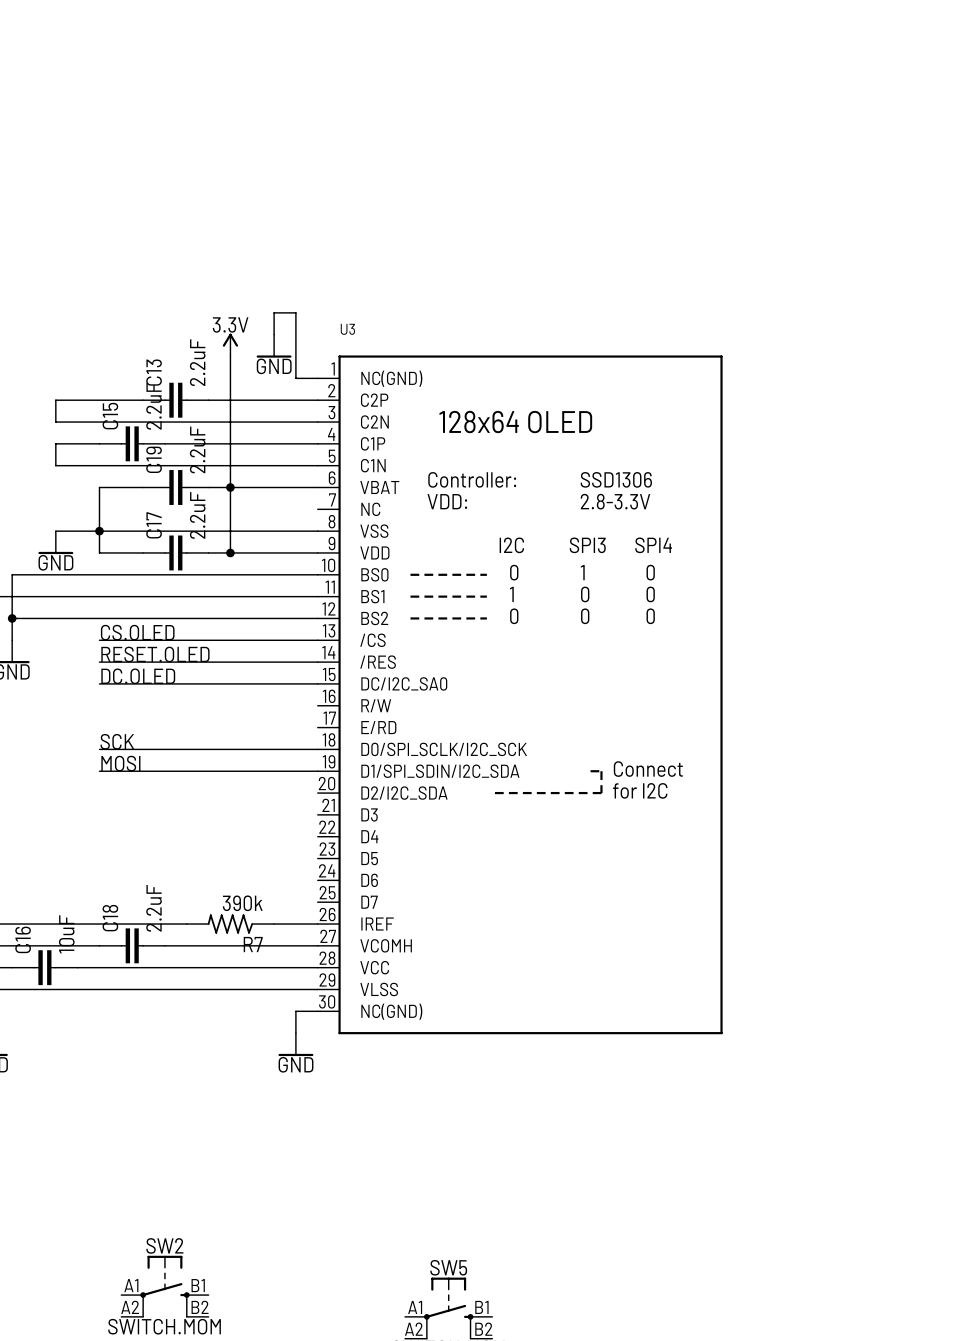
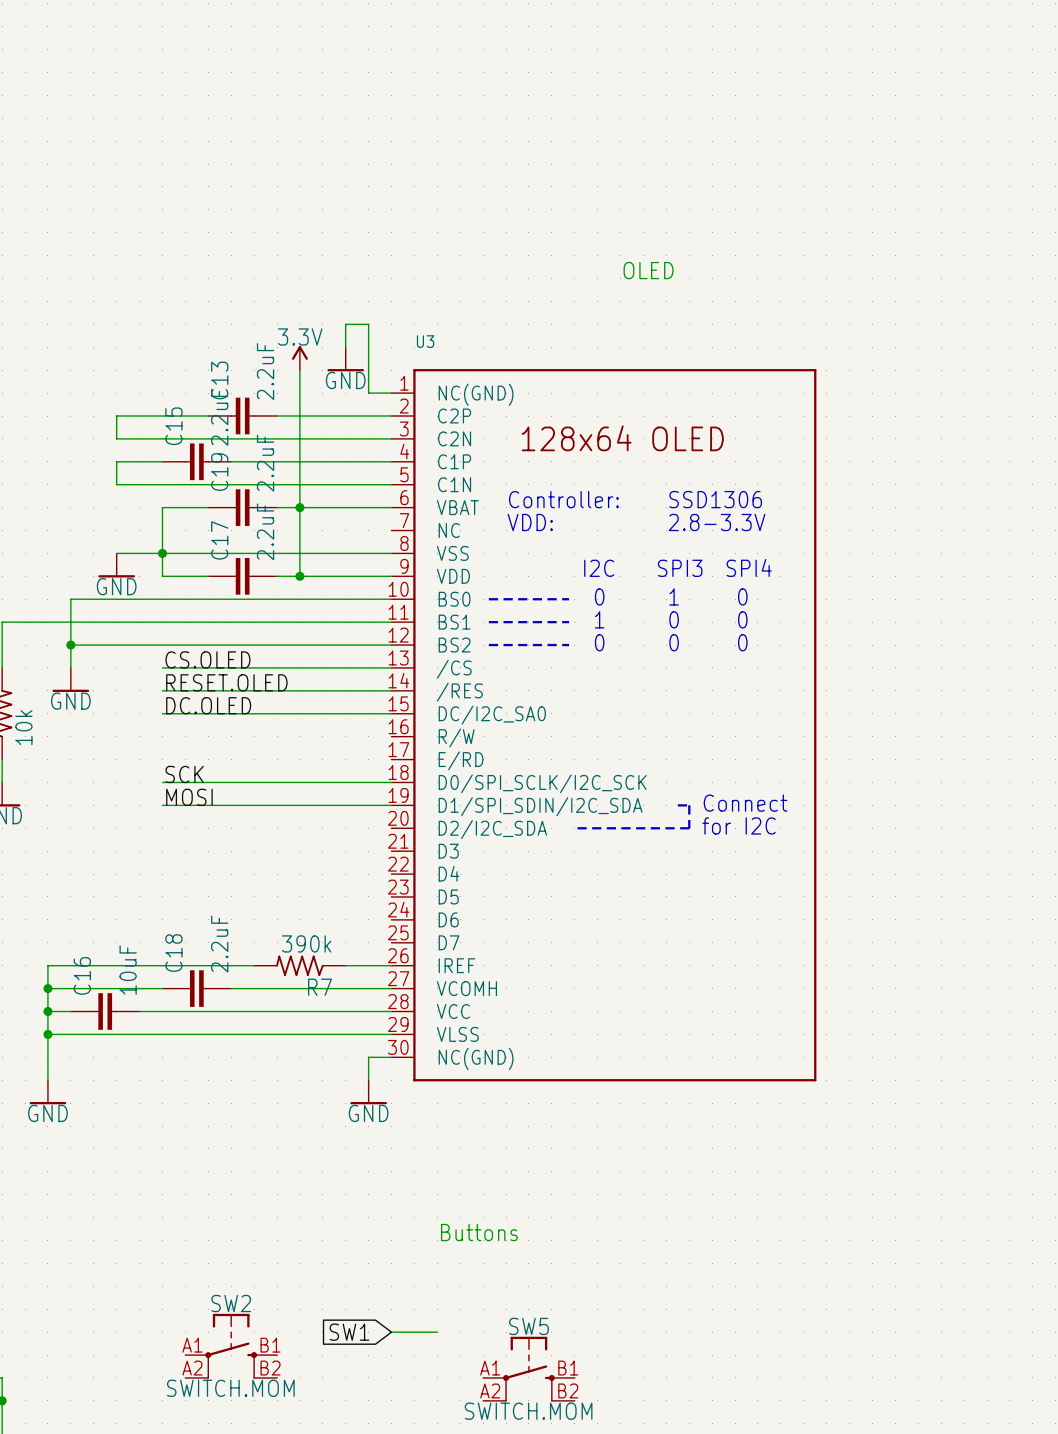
text: none -> OLED (648, 270)
text: none -> Buttons (479, 1232)
global label: none -> SW1 (349, 1332)
wire: none -> (391, 1332) (437, 1332)

